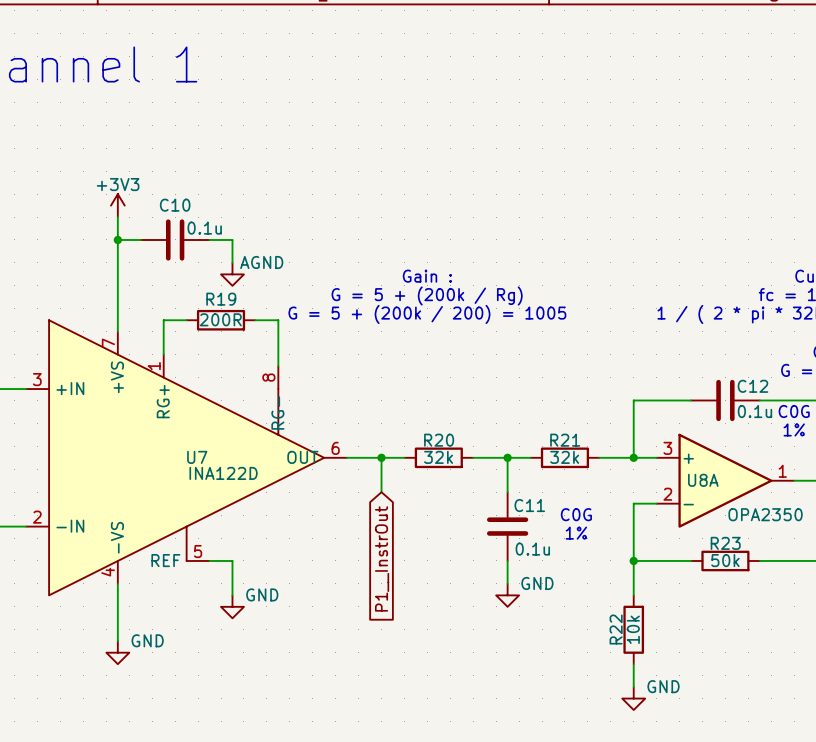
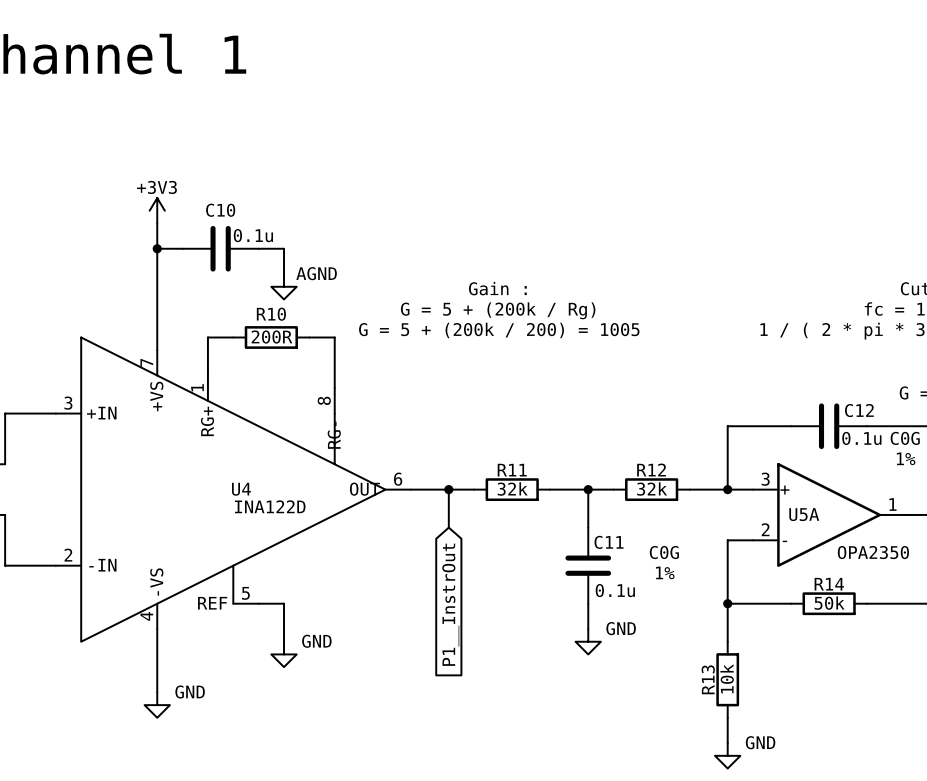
R19 name: R19 (221, 299) -> R10 (271, 314)
R20 name: R20 (439, 440) -> R11 (512, 470)
R21 name: R21 (565, 440) -> R12 (651, 470)
U7 name: U7 (197, 457) -> U4 (241, 489)
U8A name: U8A (703, 480) -> U5A (804, 514)
R23 name: R23 (725, 543) -> R14 (829, 584)
R22 name: R22 (616, 629) -> R13 (708, 679)

